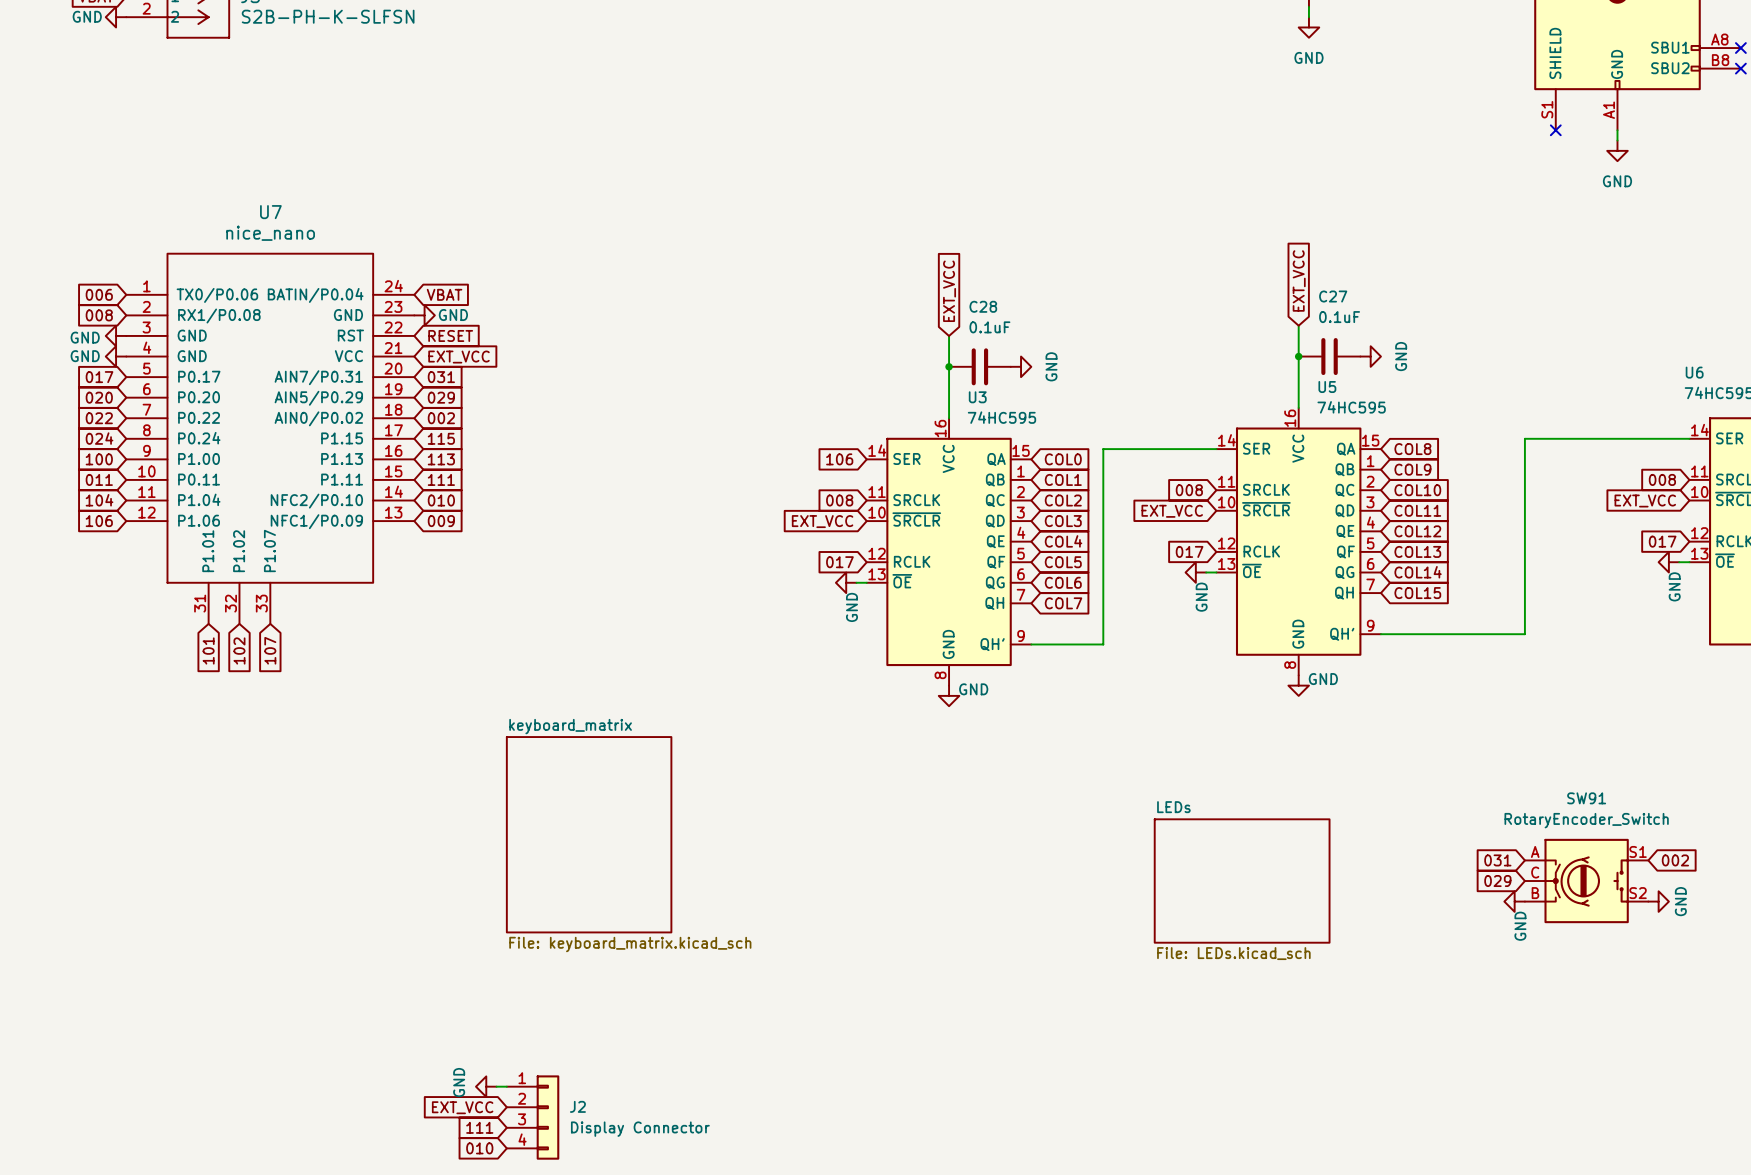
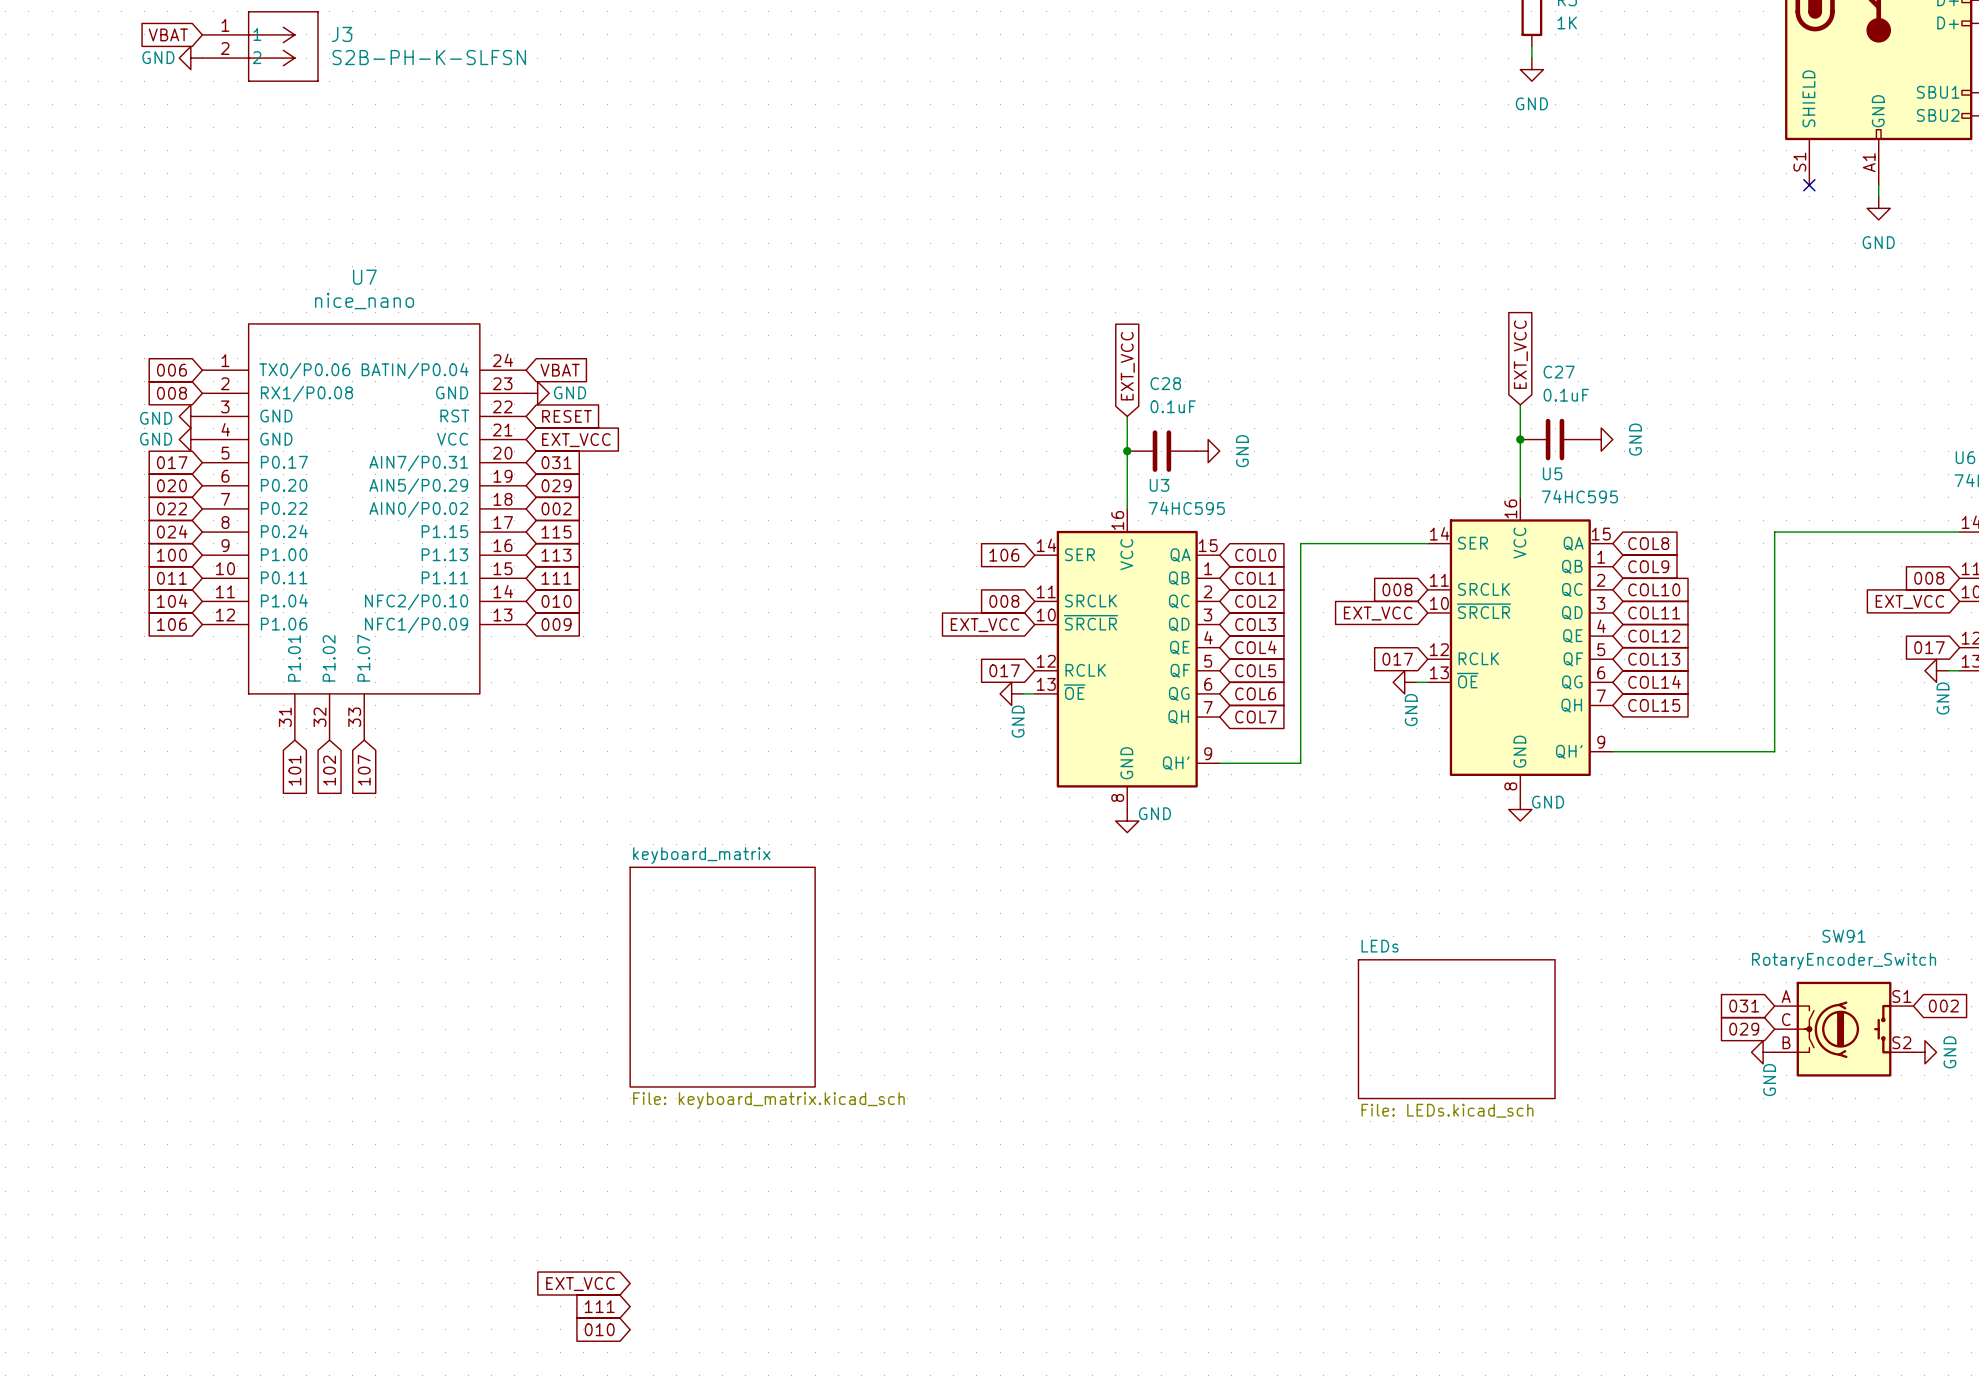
power symbol: GND (486, 1086) -> none
wire: (496, 1086) (506, 1086) -> none
J2: Display Connector (533, 1117) -> none

